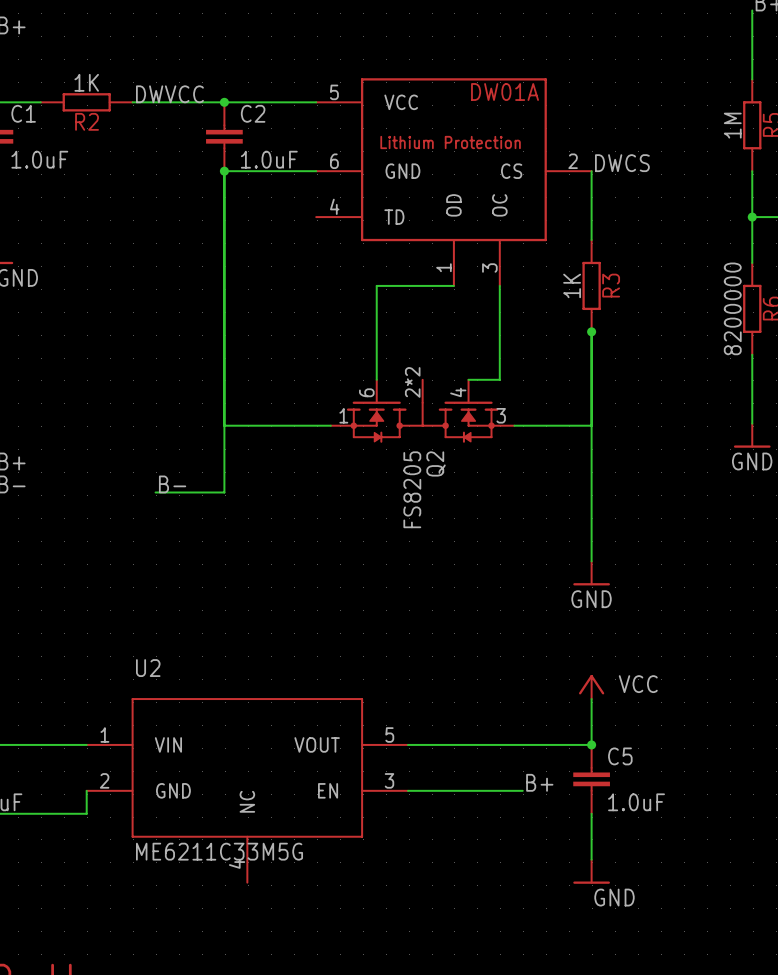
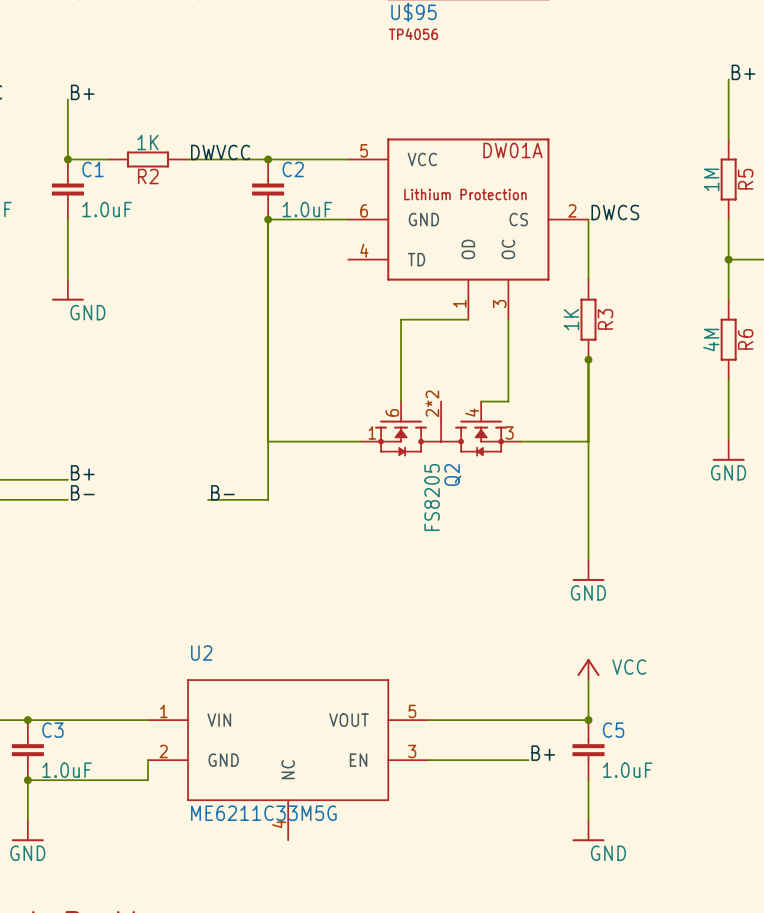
R6 value: 8200000 (732, 308) -> 4M (711, 339)

